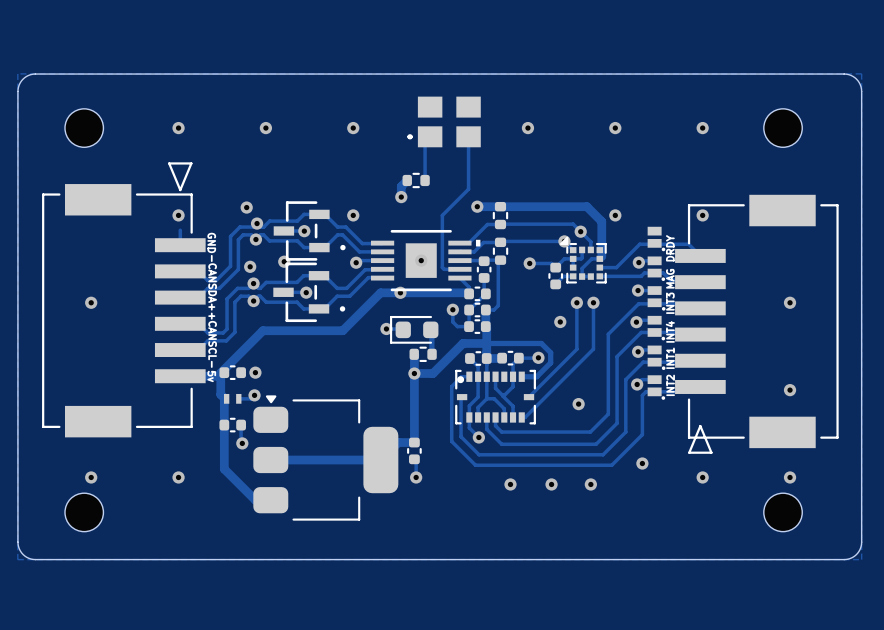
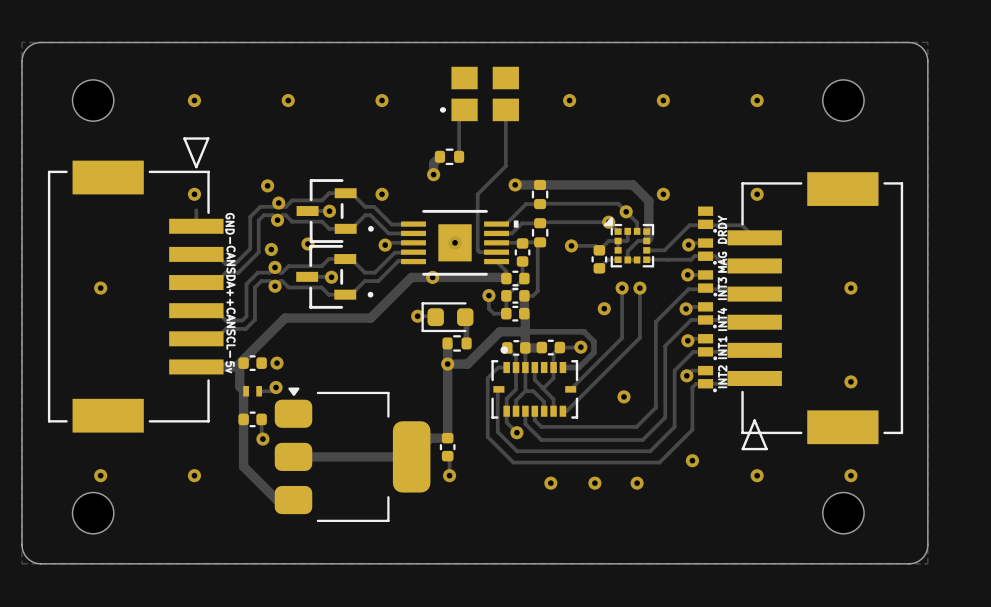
part footprint: [455, 369, 536, 425] -> [491, 346, 579, 419]

